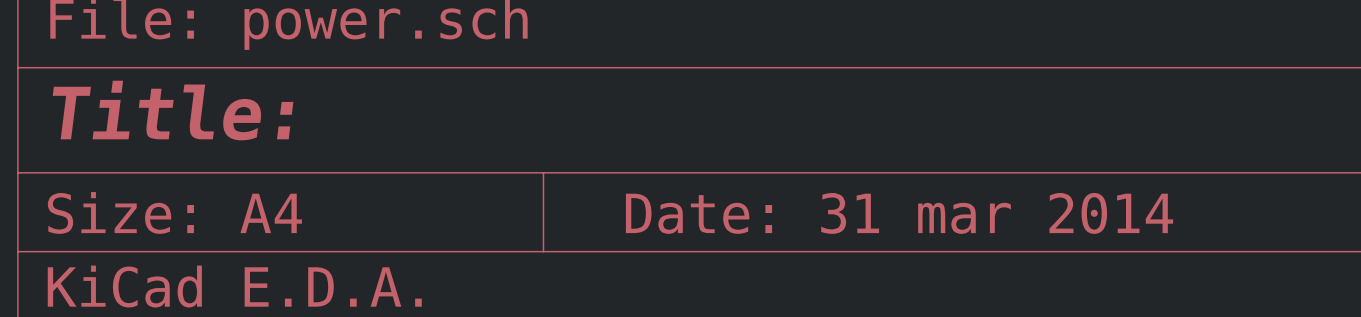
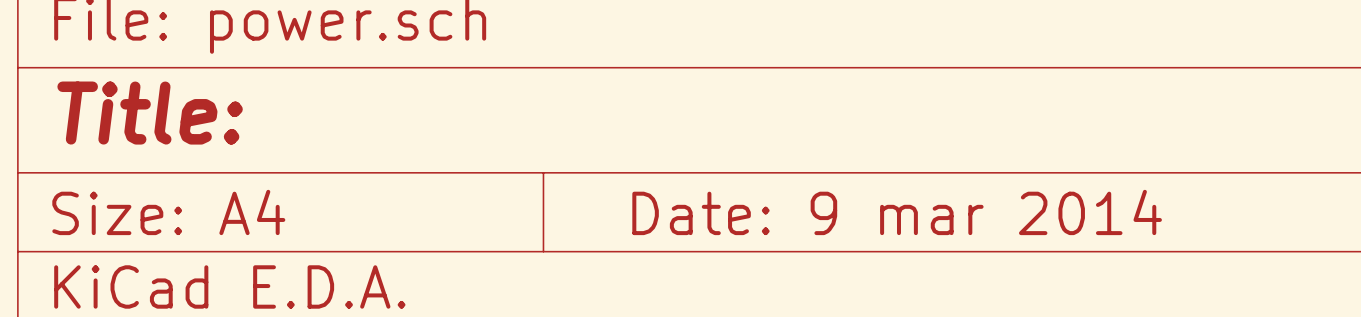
title block: Date: 31 mar 2014 (899, 213) -> Date: 9 mar 2014 (897, 212)

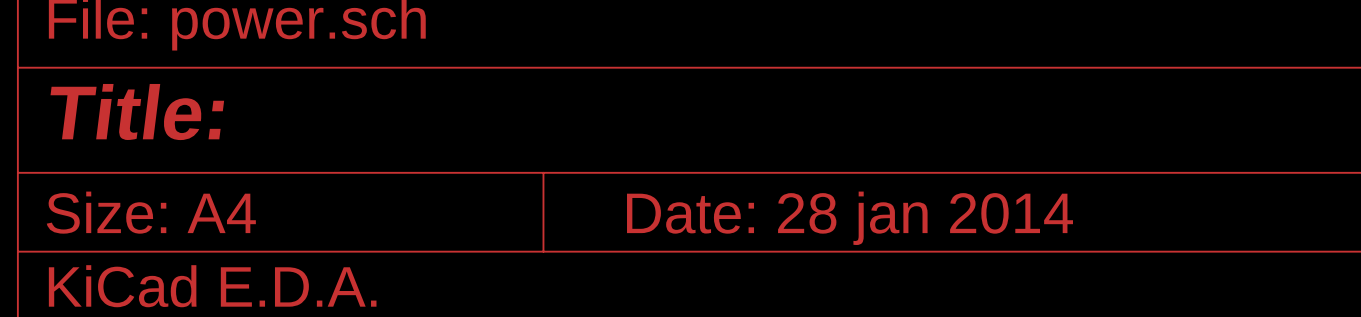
title block: Date: 9 mar 2014 (897, 212) -> Date: 28 jan 2014 (850, 218)

